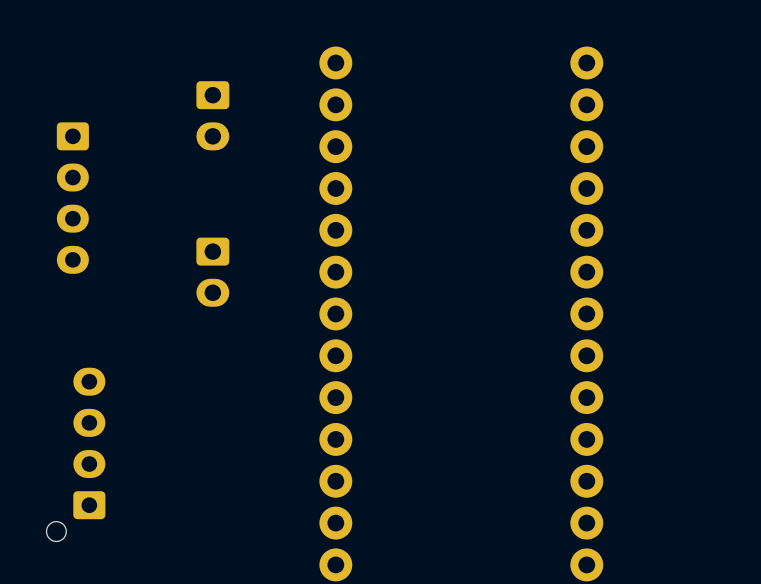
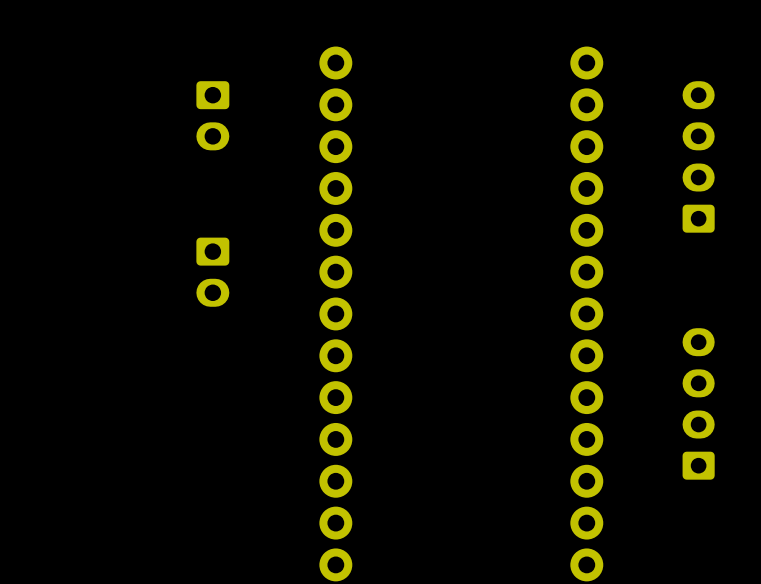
part: none -> (698, 156)
part: (72, 198) -> none
part: none -> (698, 403)
part: (75, 454) -> none

